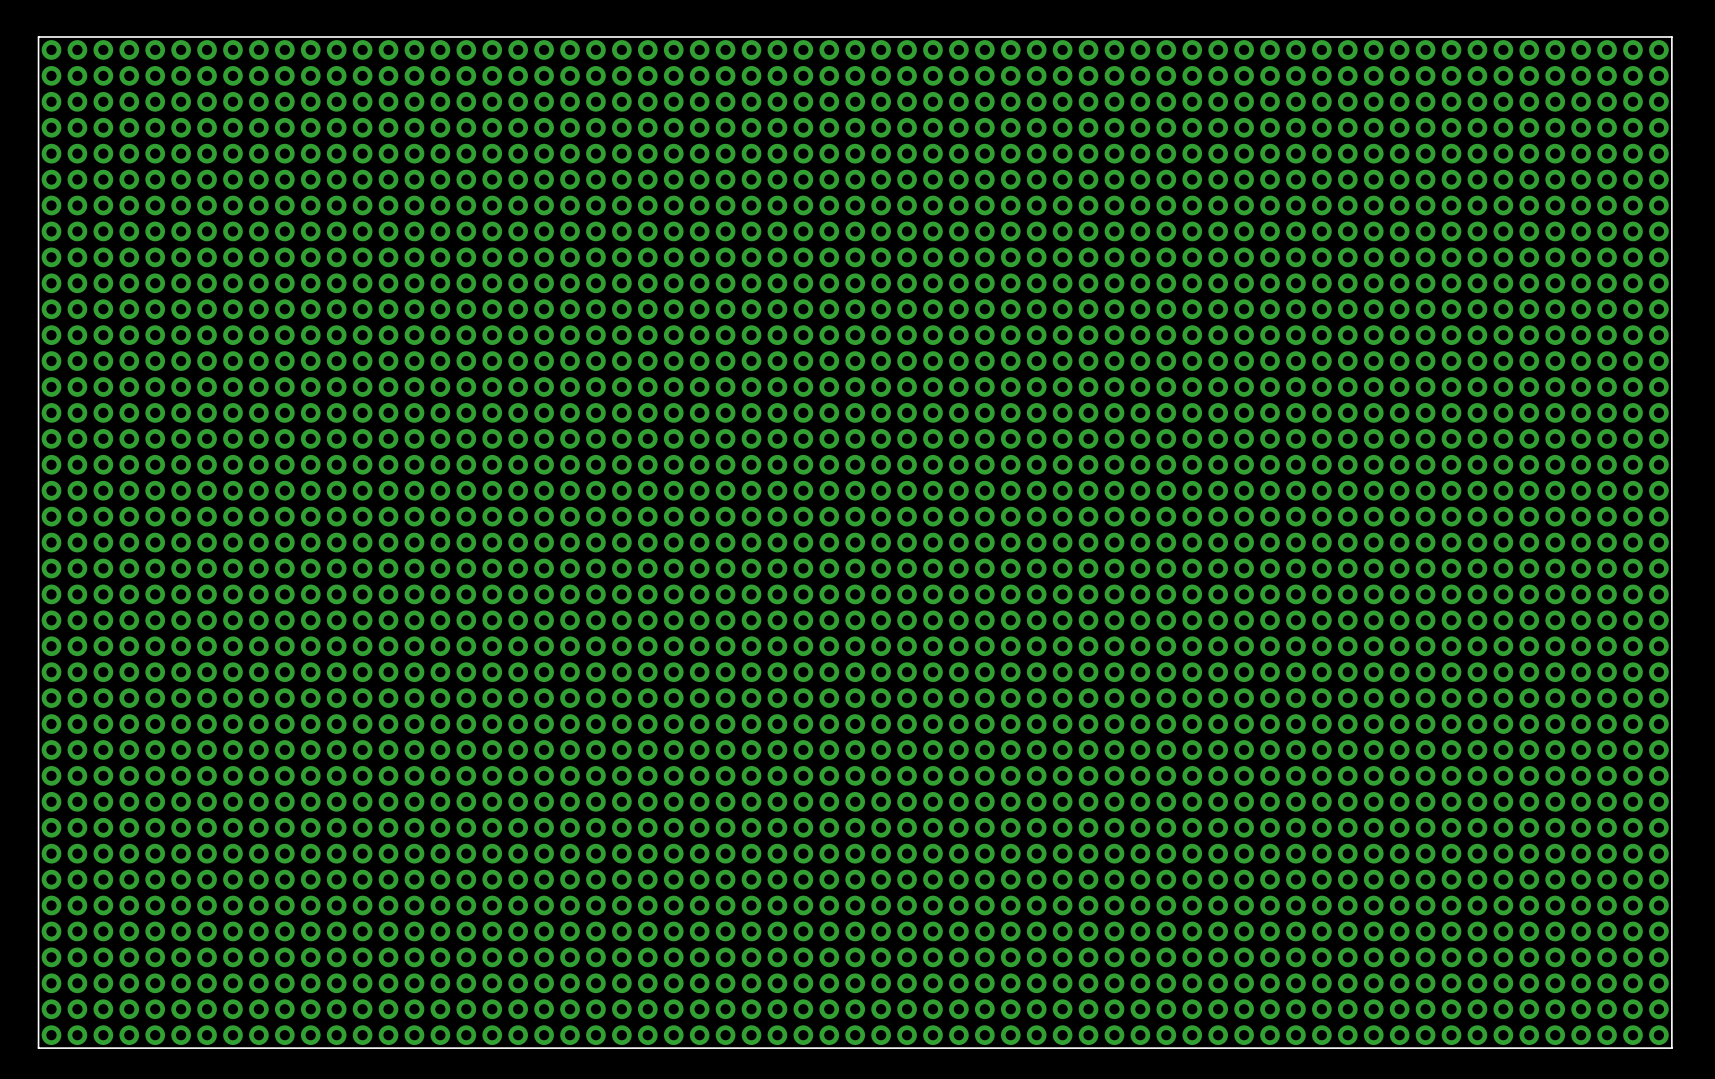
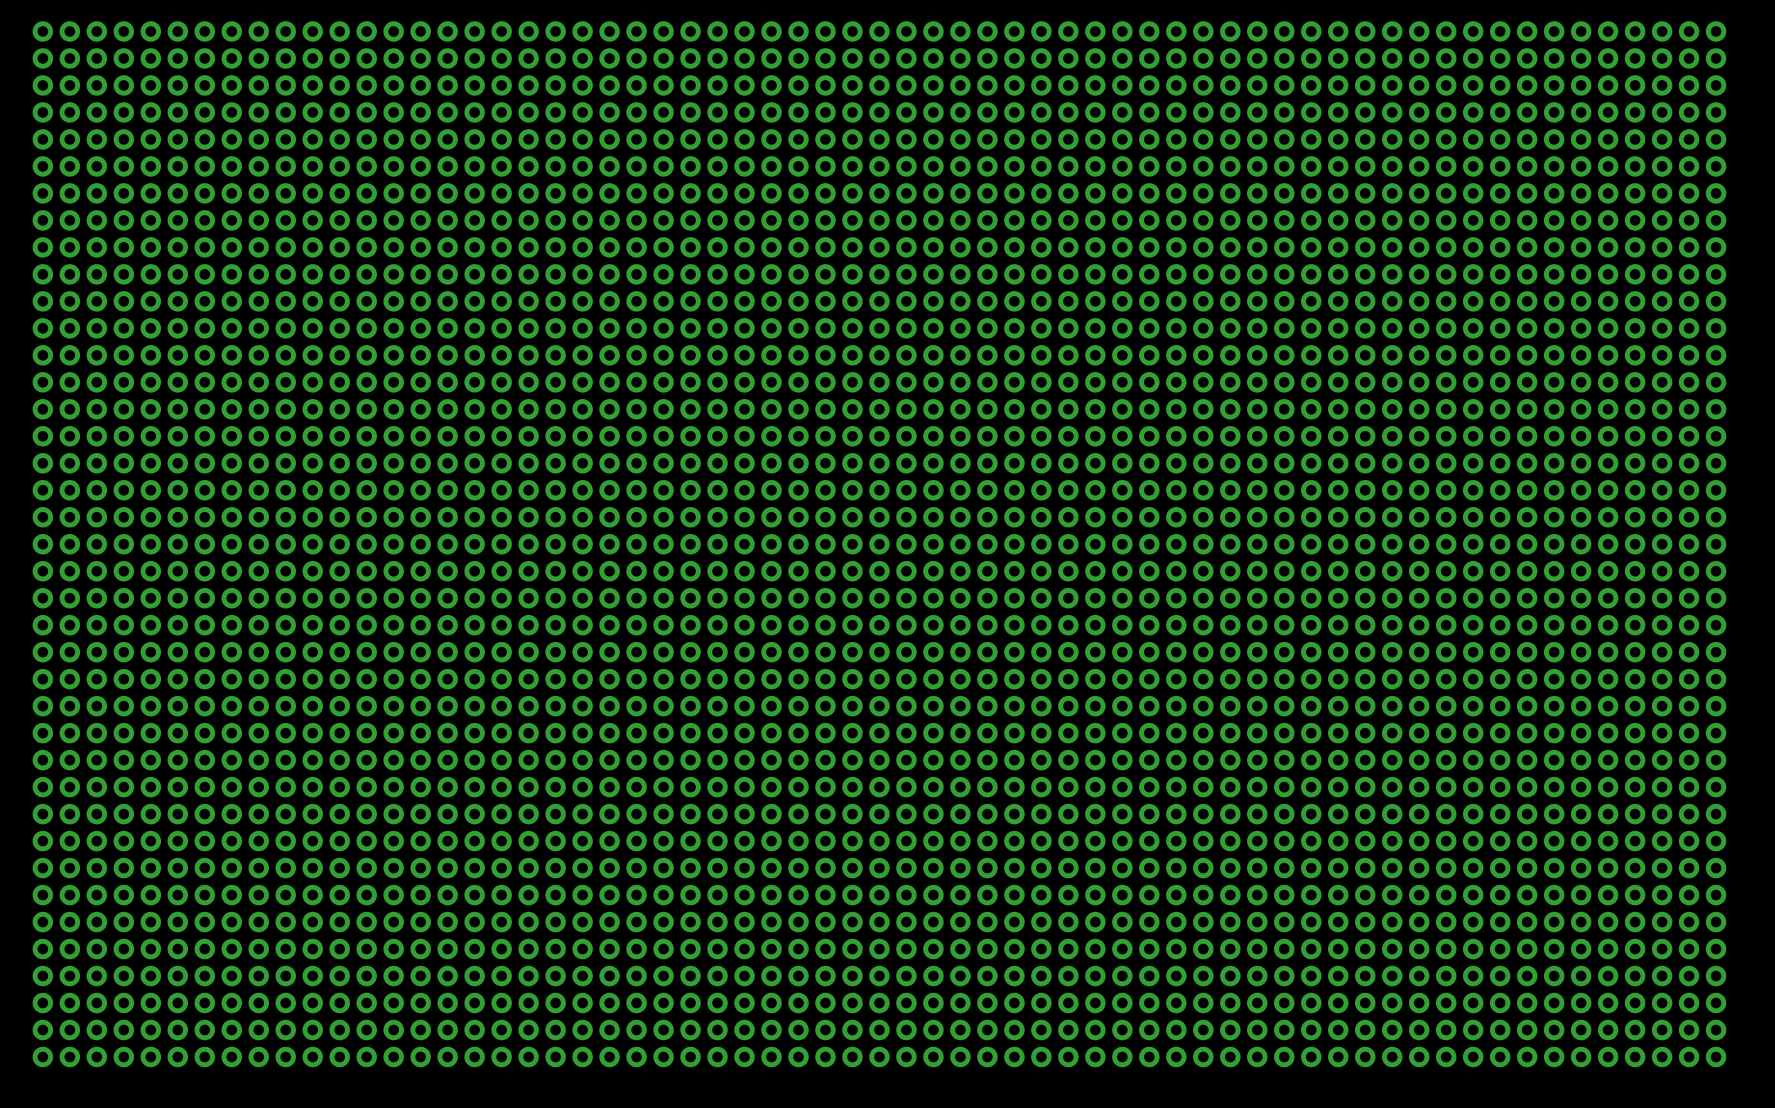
board edge: (1671, 37) (1671, 1048) (38, 1048) (38, 37) (1671, 37) -> none

